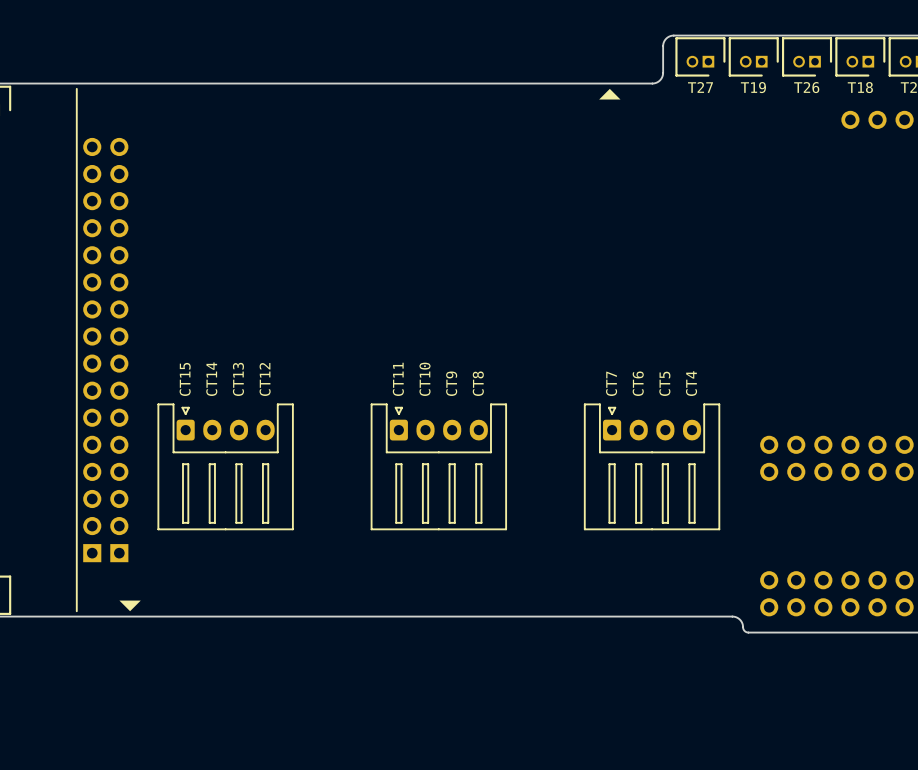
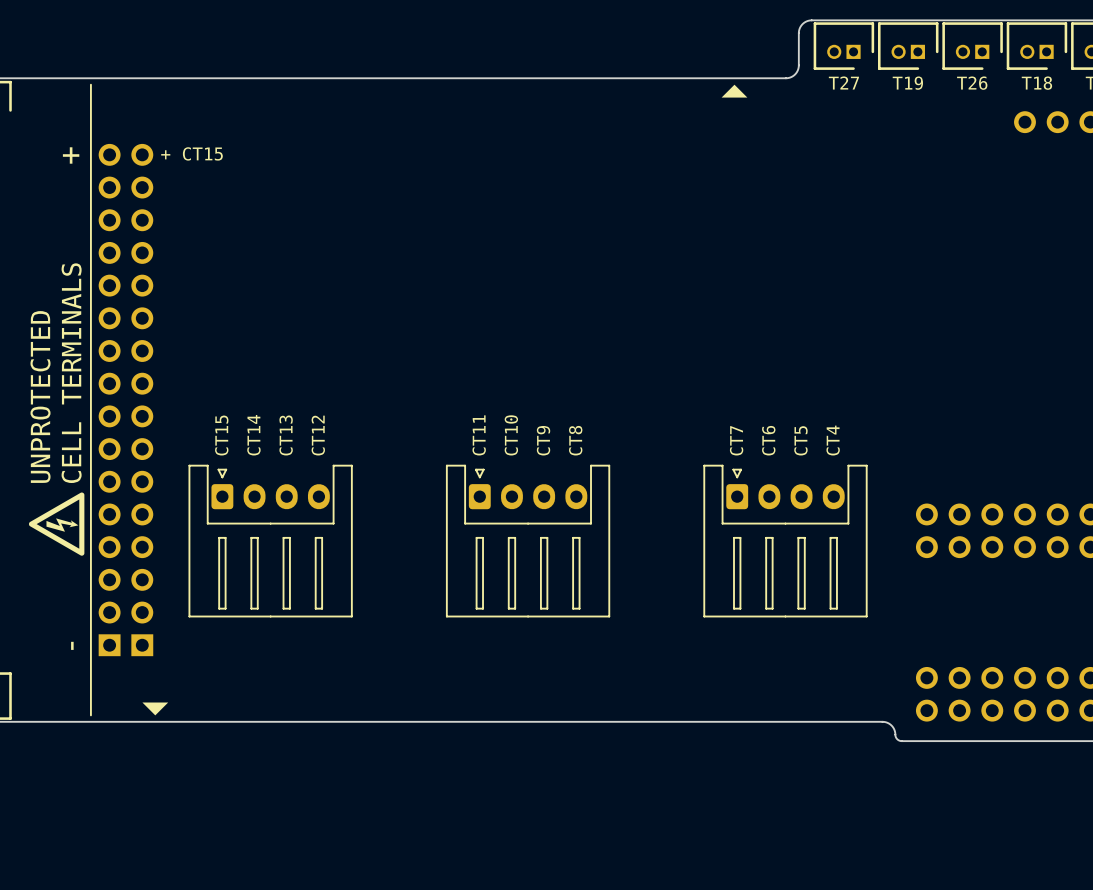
text: none -> + CT15 (192, 153)
text: none -> + (71, 155)
text: none -> CELL TERMINALS (71, 373)
text: none -> UNPROTECTED (40, 397)
drawing: none -> [29, 492, 85, 556]
text: none -> - (72, 645)

